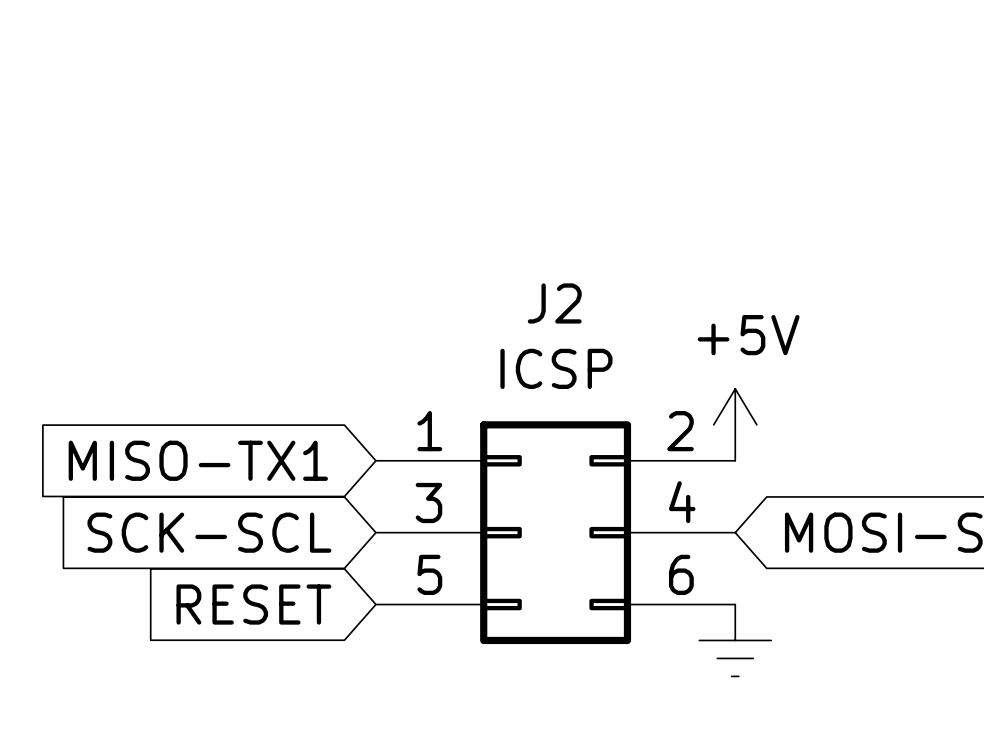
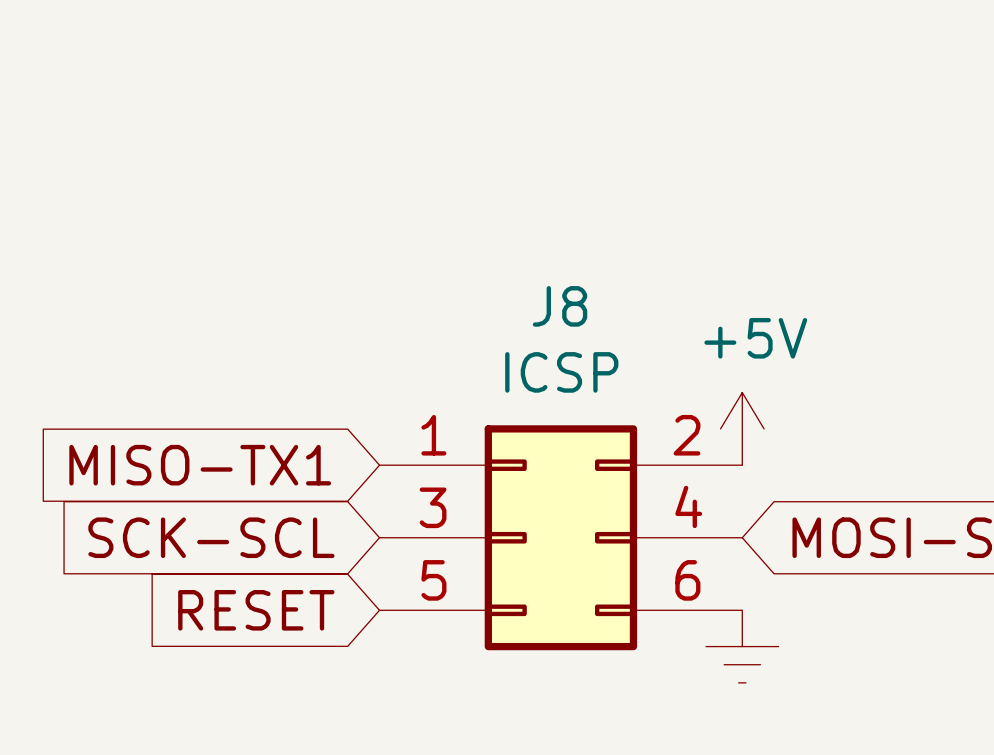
J2 name: J2 (554, 303) -> J8 (560, 306)

